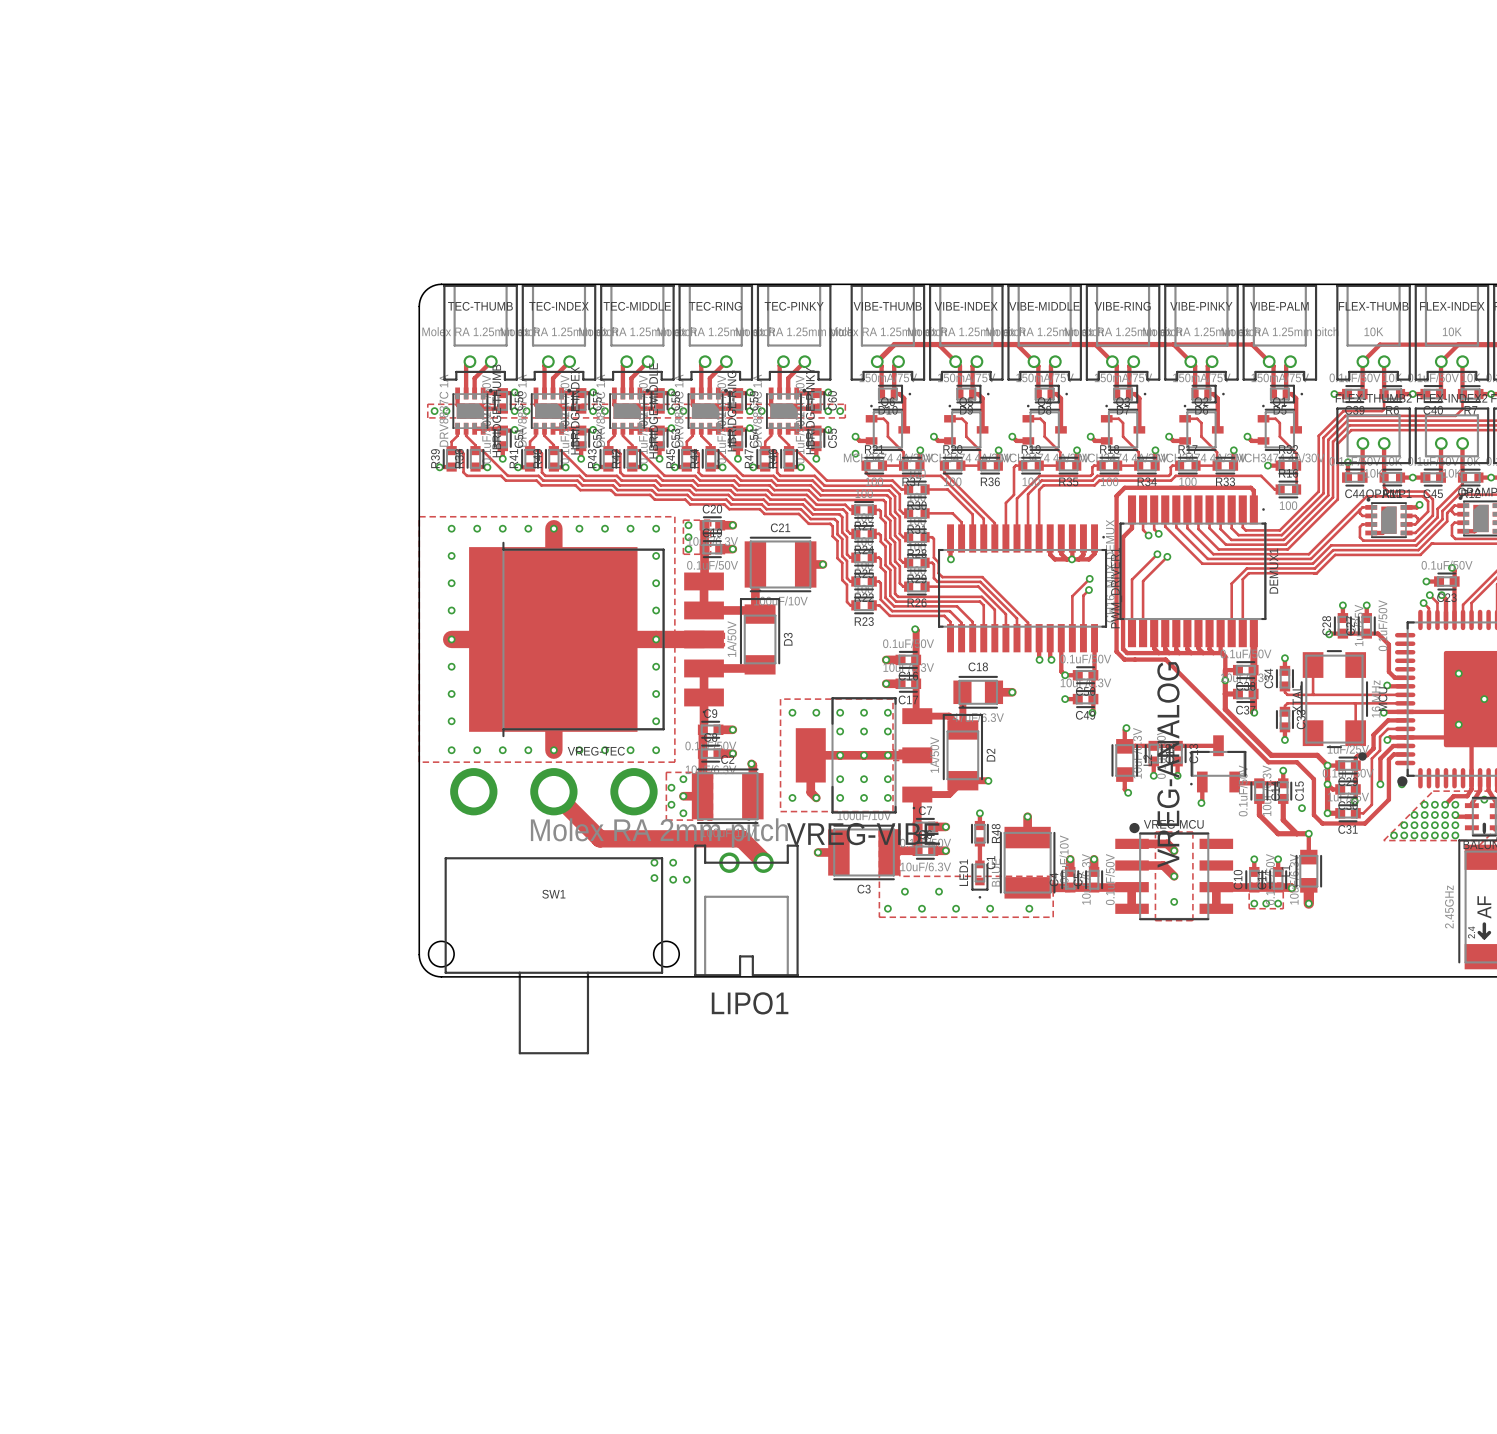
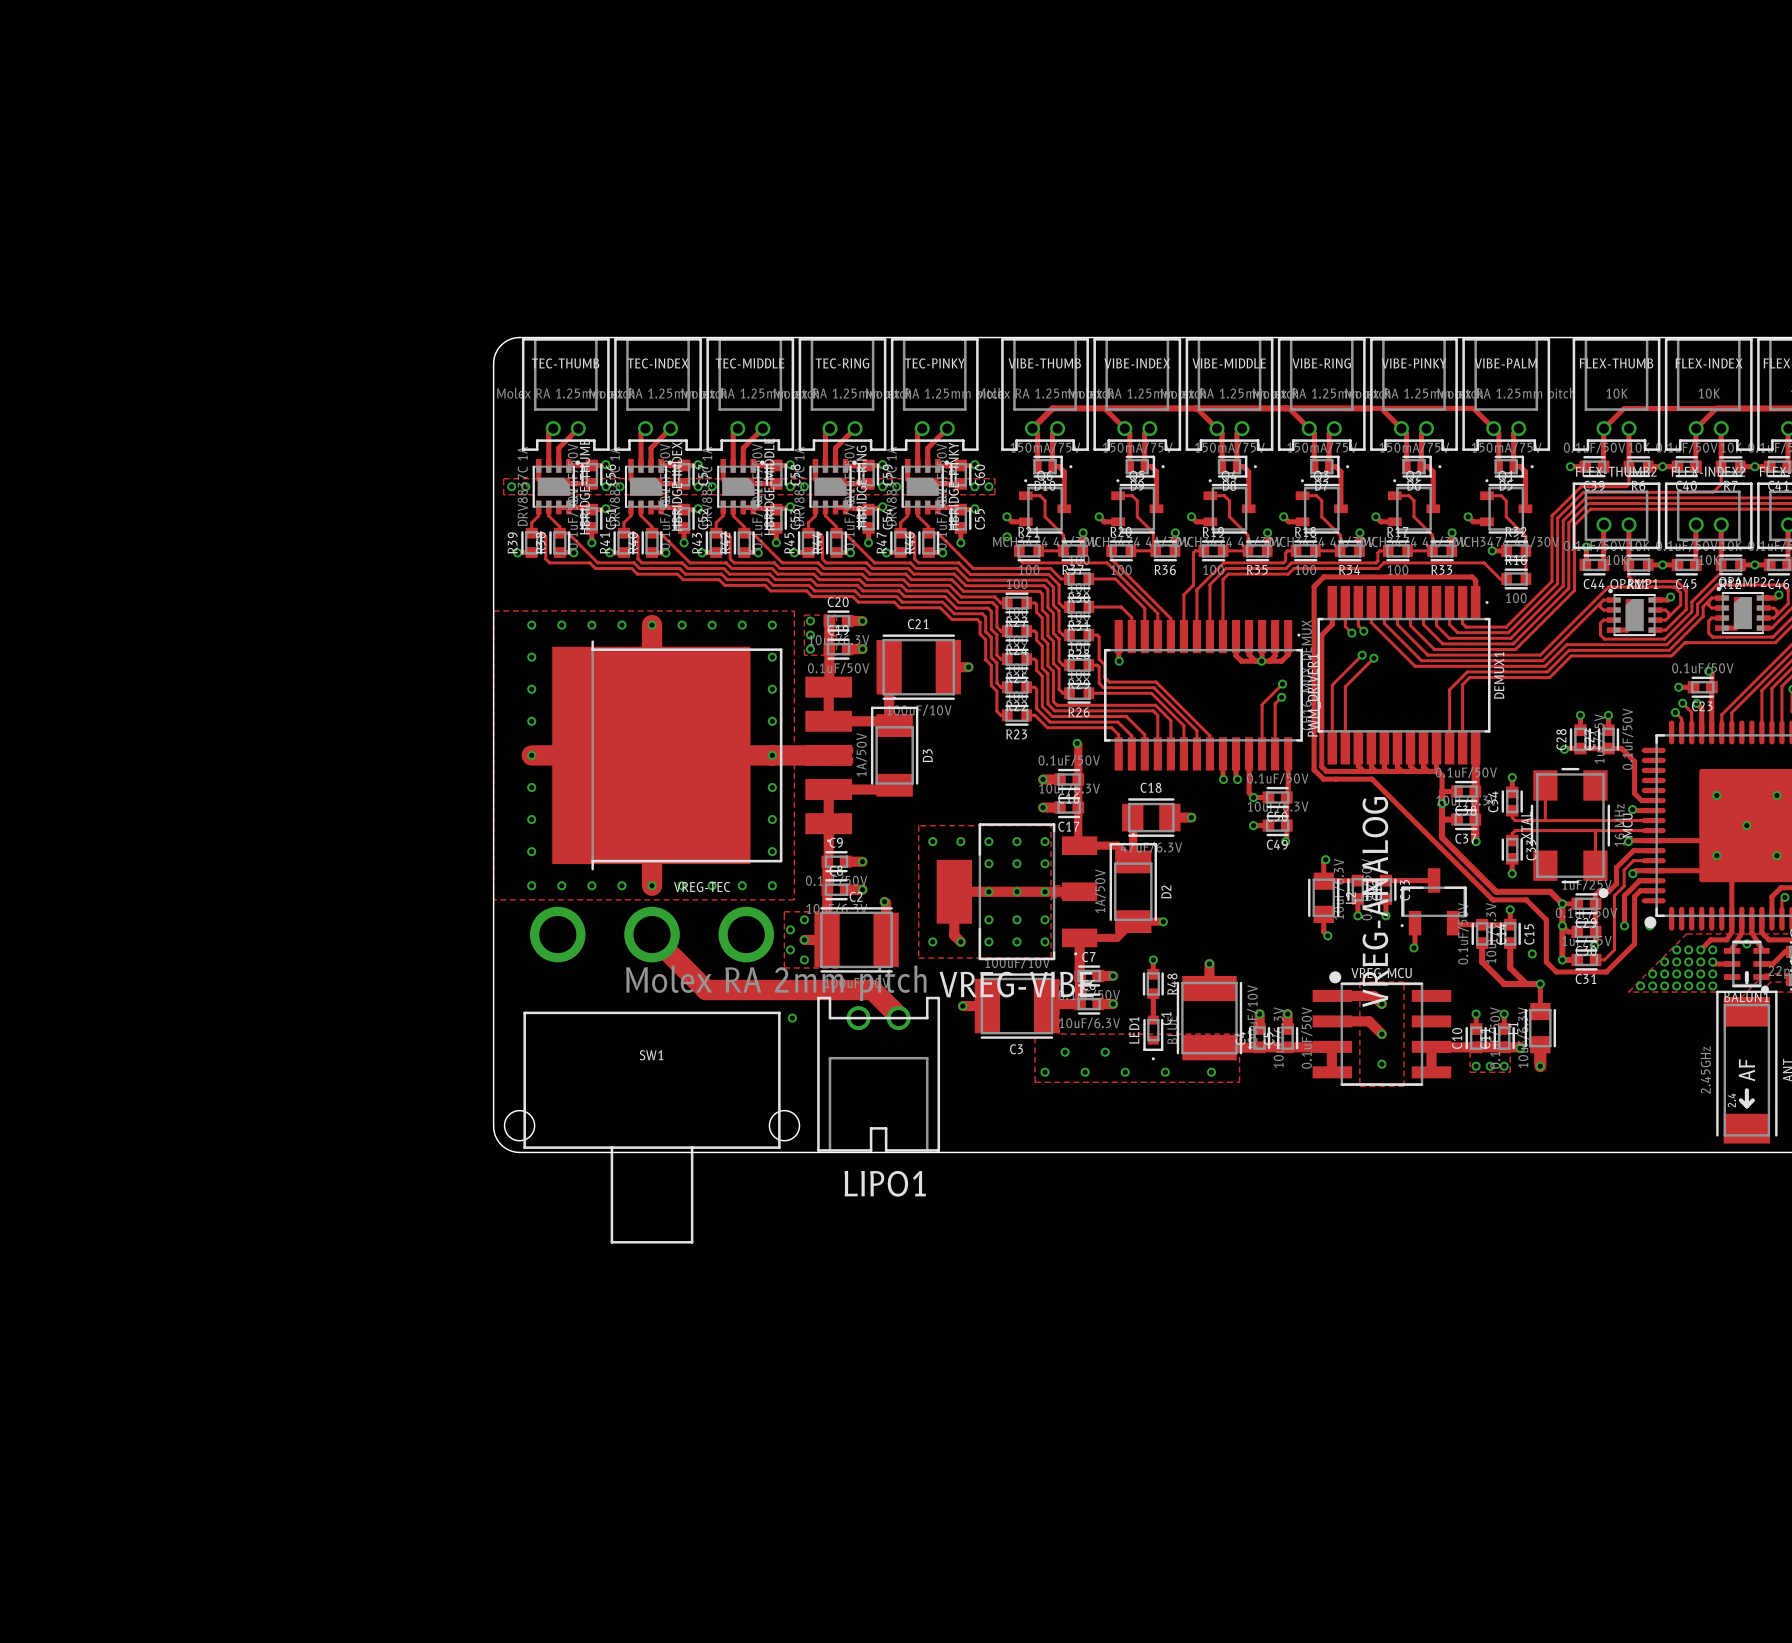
via: (654, 862) -> none
via: (654, 878) -> none
via: (673, 879) -> none
via: (686, 879) -> none

